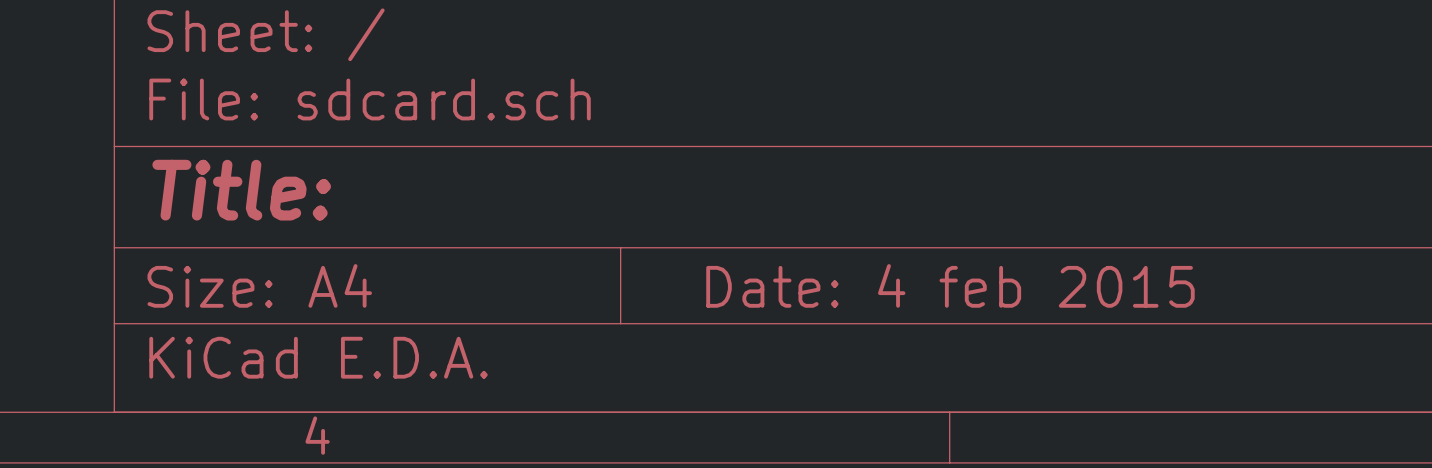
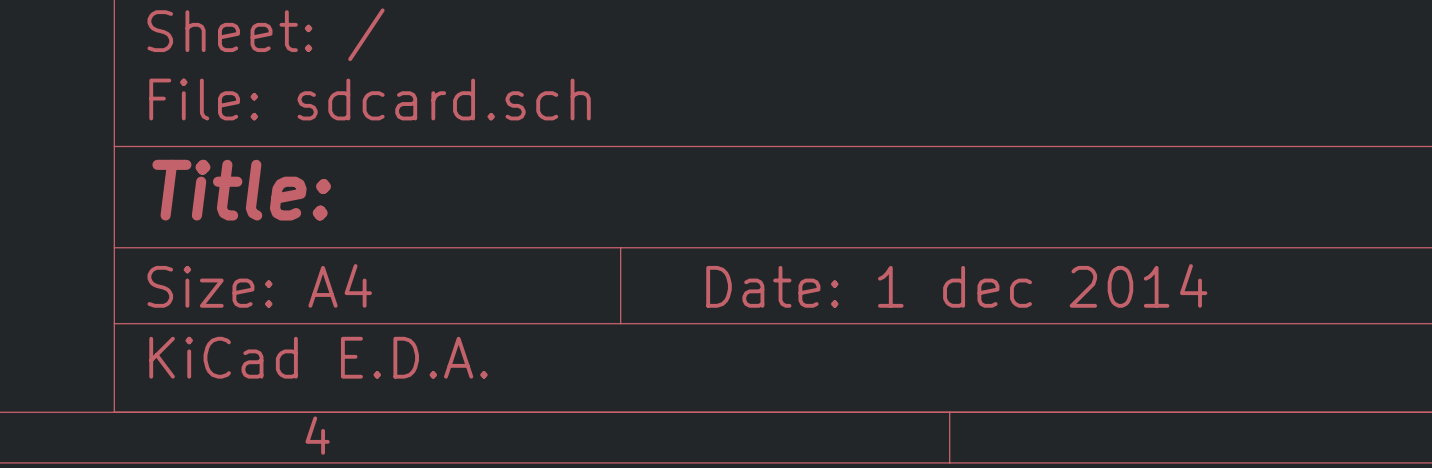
title block: Date: 4 feb 2015 (950, 285) -> Date: 1 dec 2014 (956, 285)

